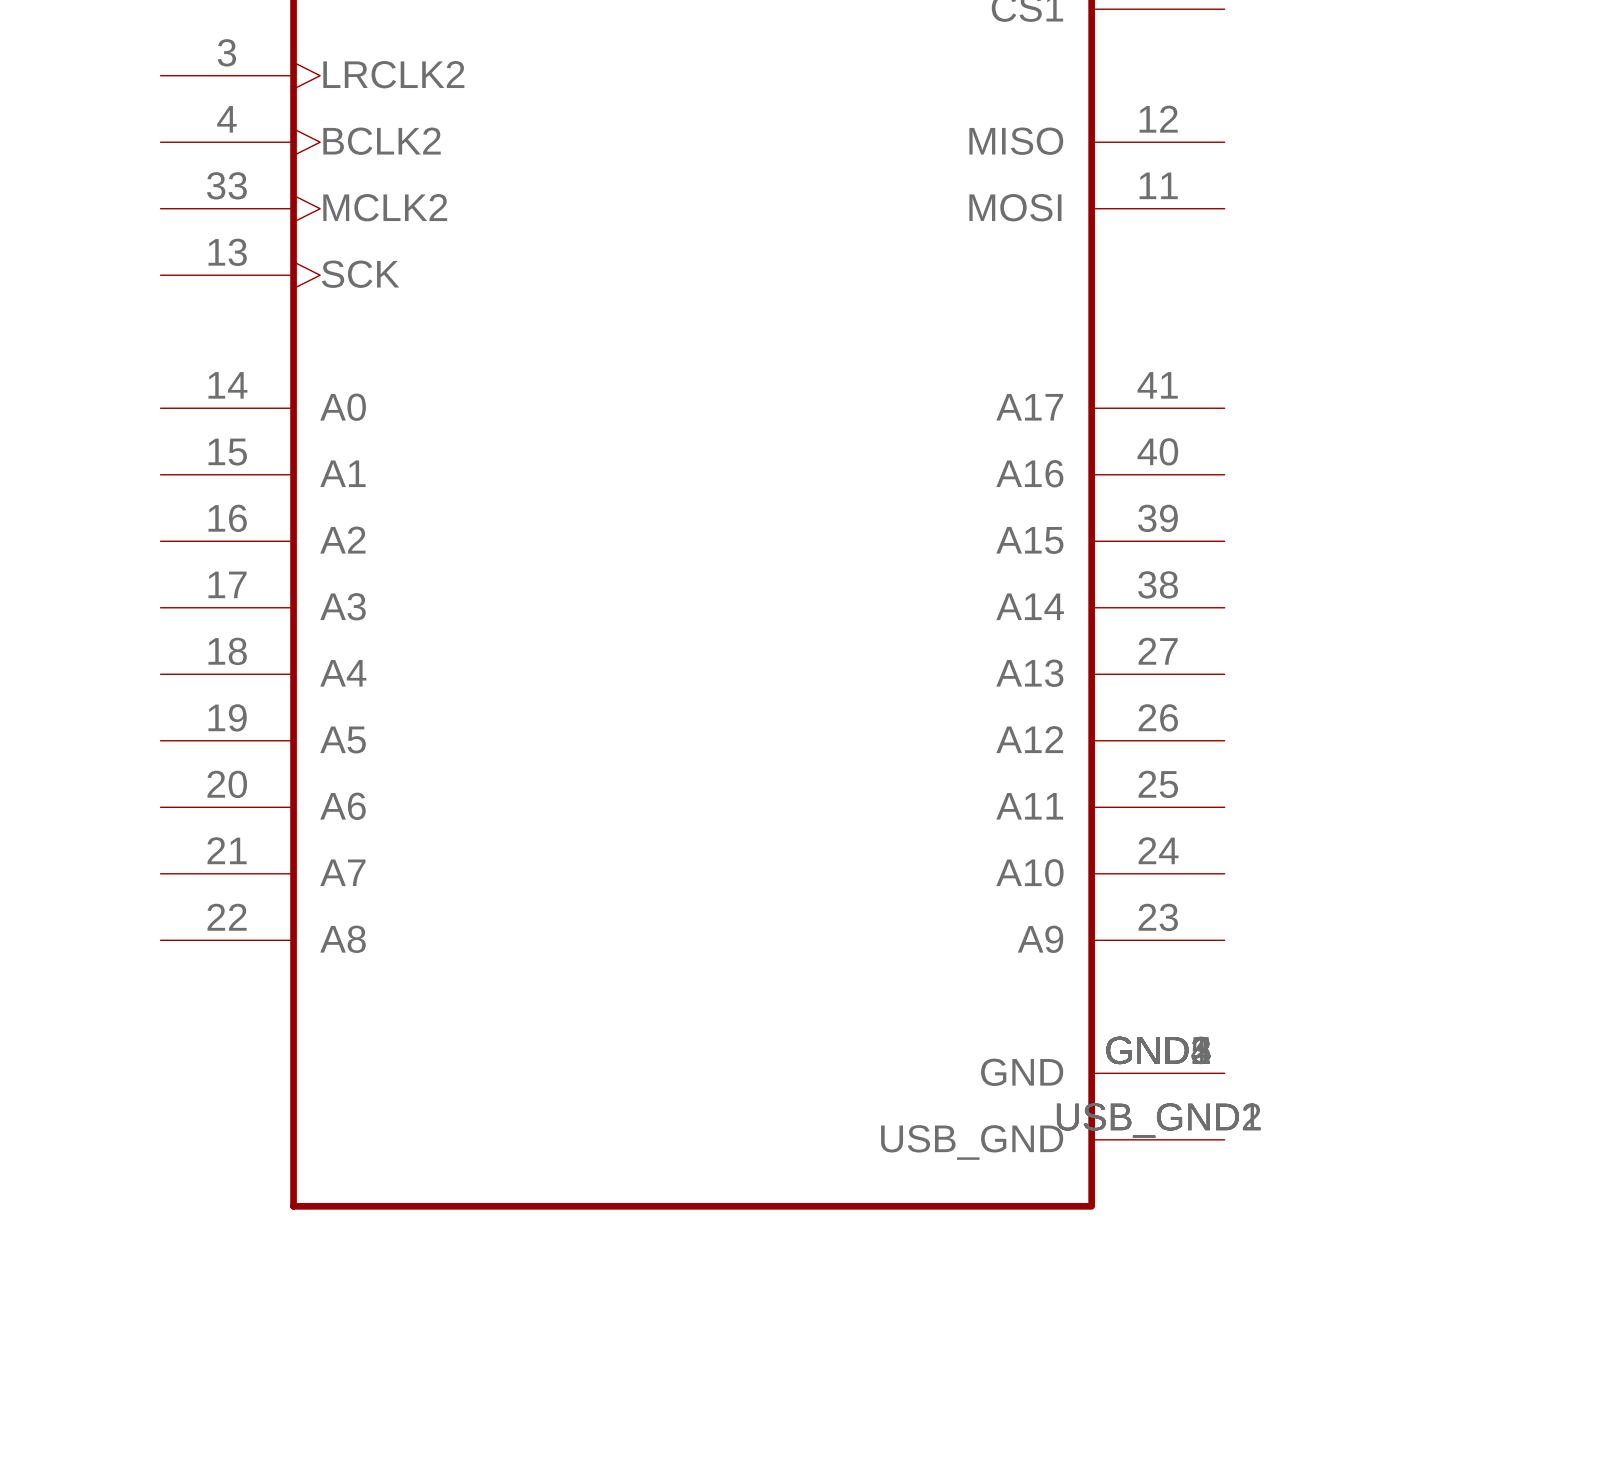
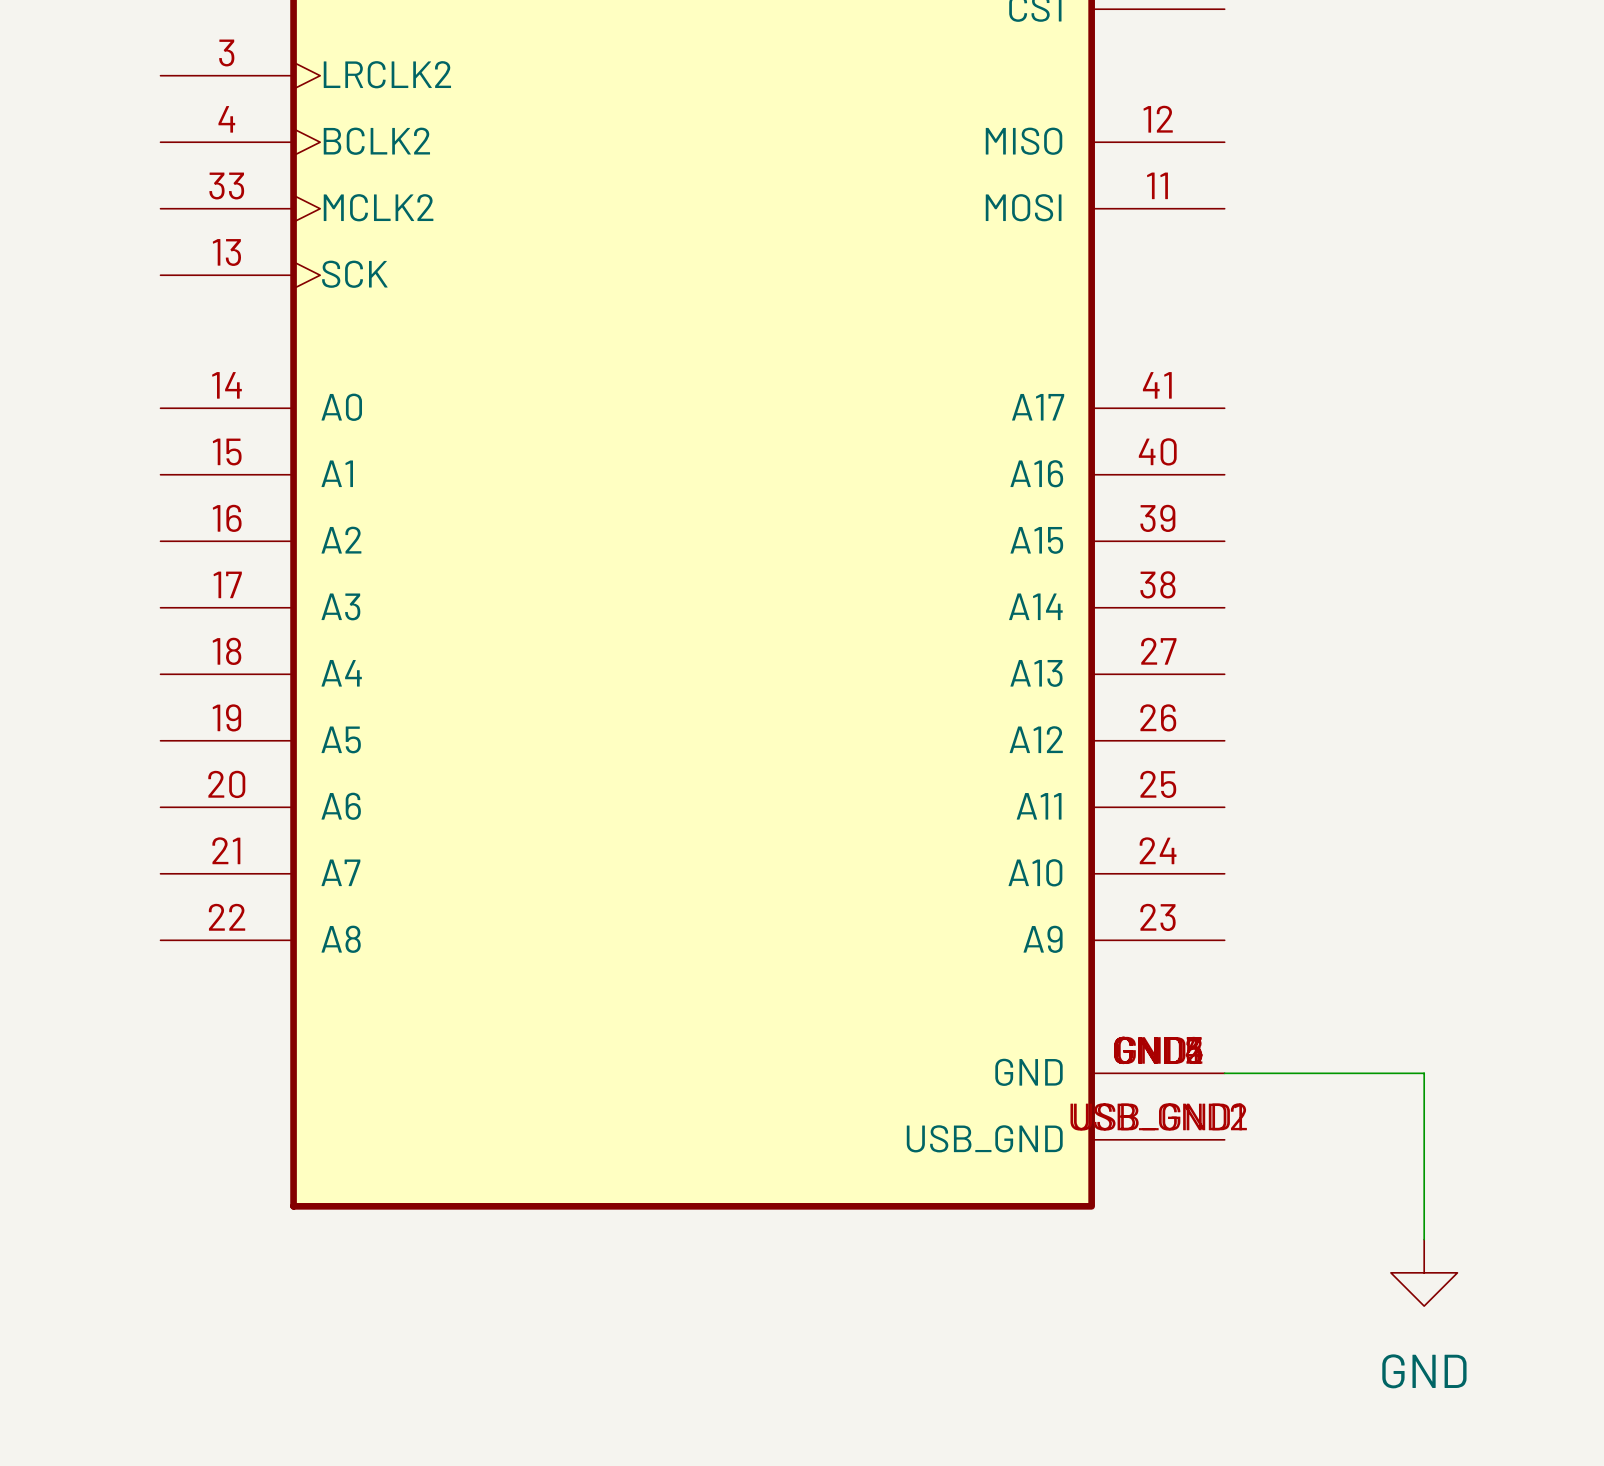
wire: none -> (1224, 1073) (1424, 1073) (1424, 1239)
power symbol: none -> GND (1424, 1272)

